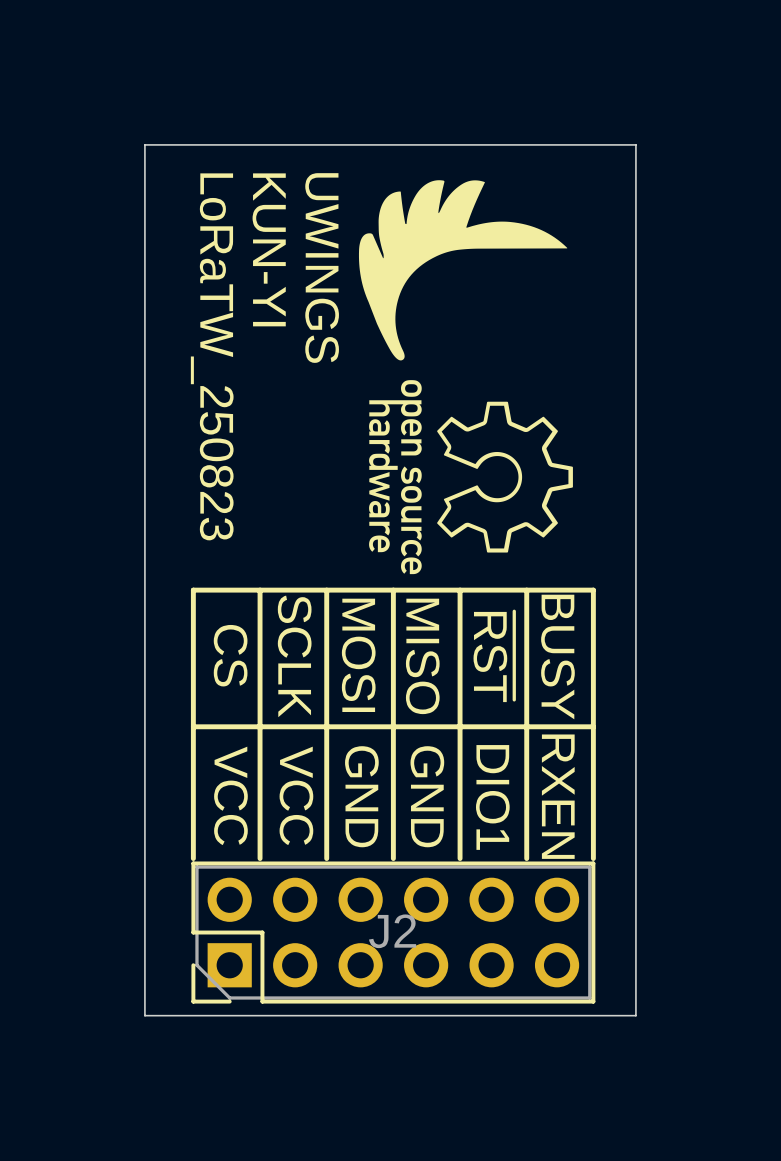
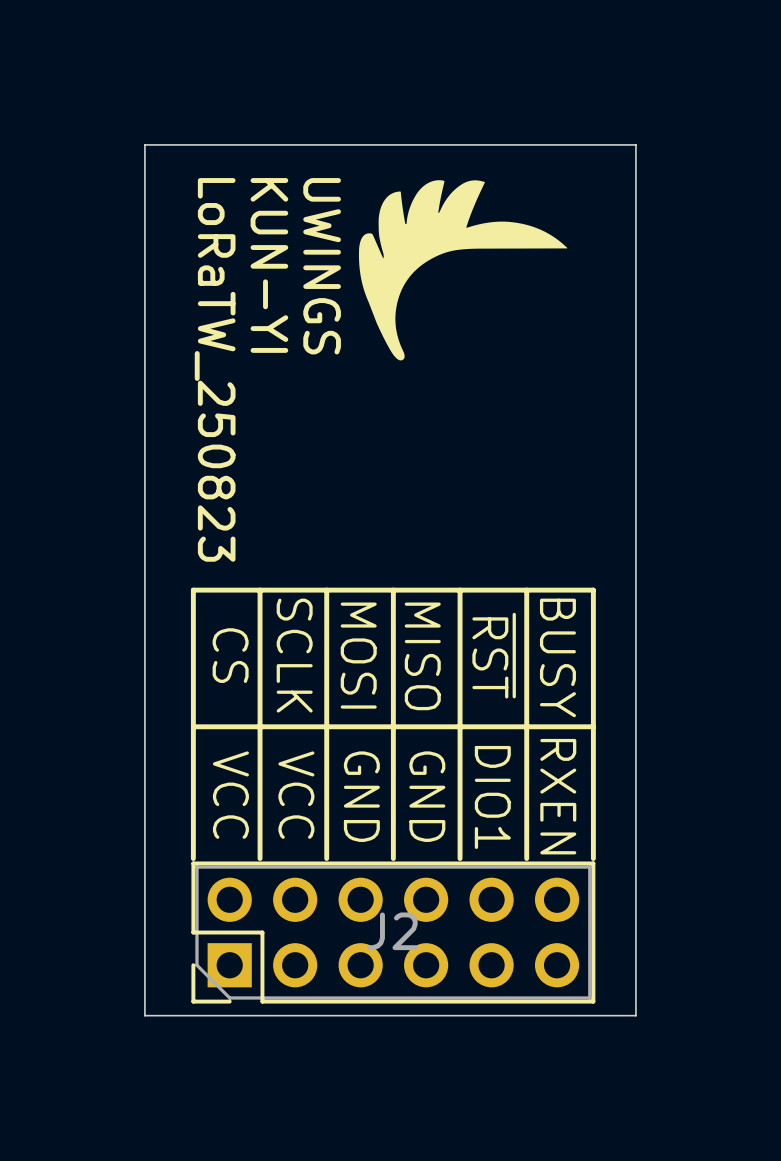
drawing: [369, 380, 573, 575] -> none

